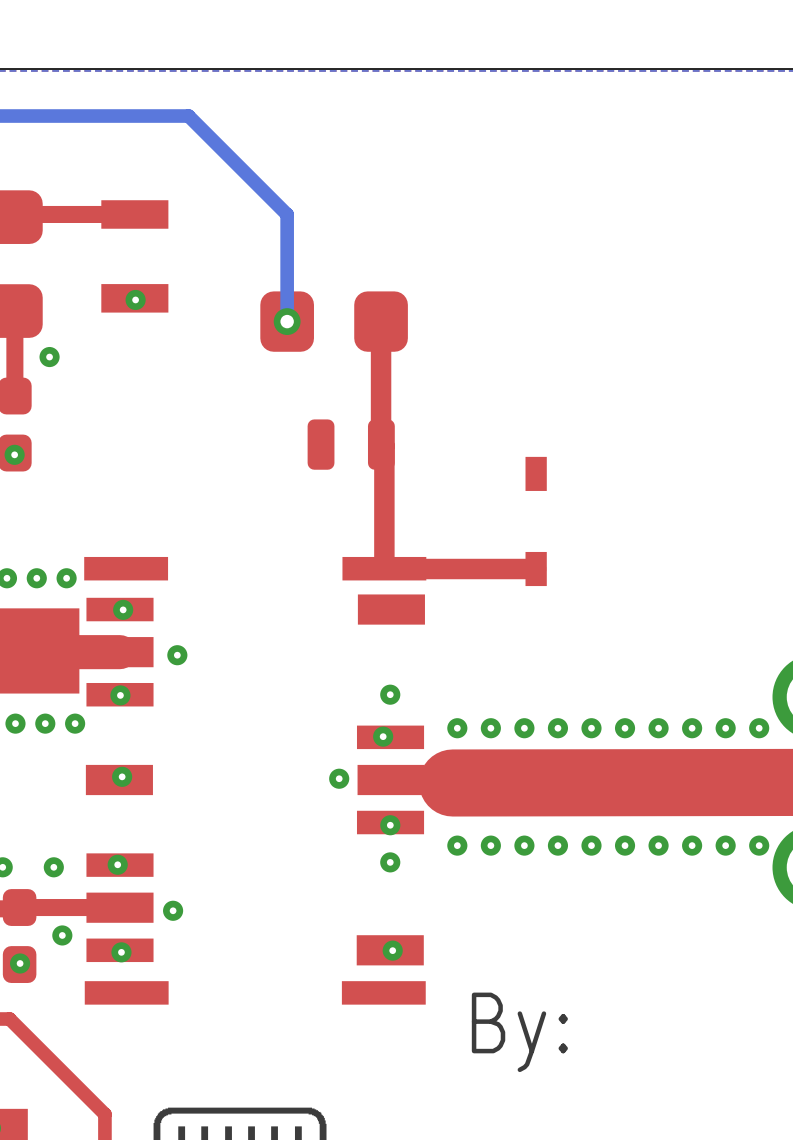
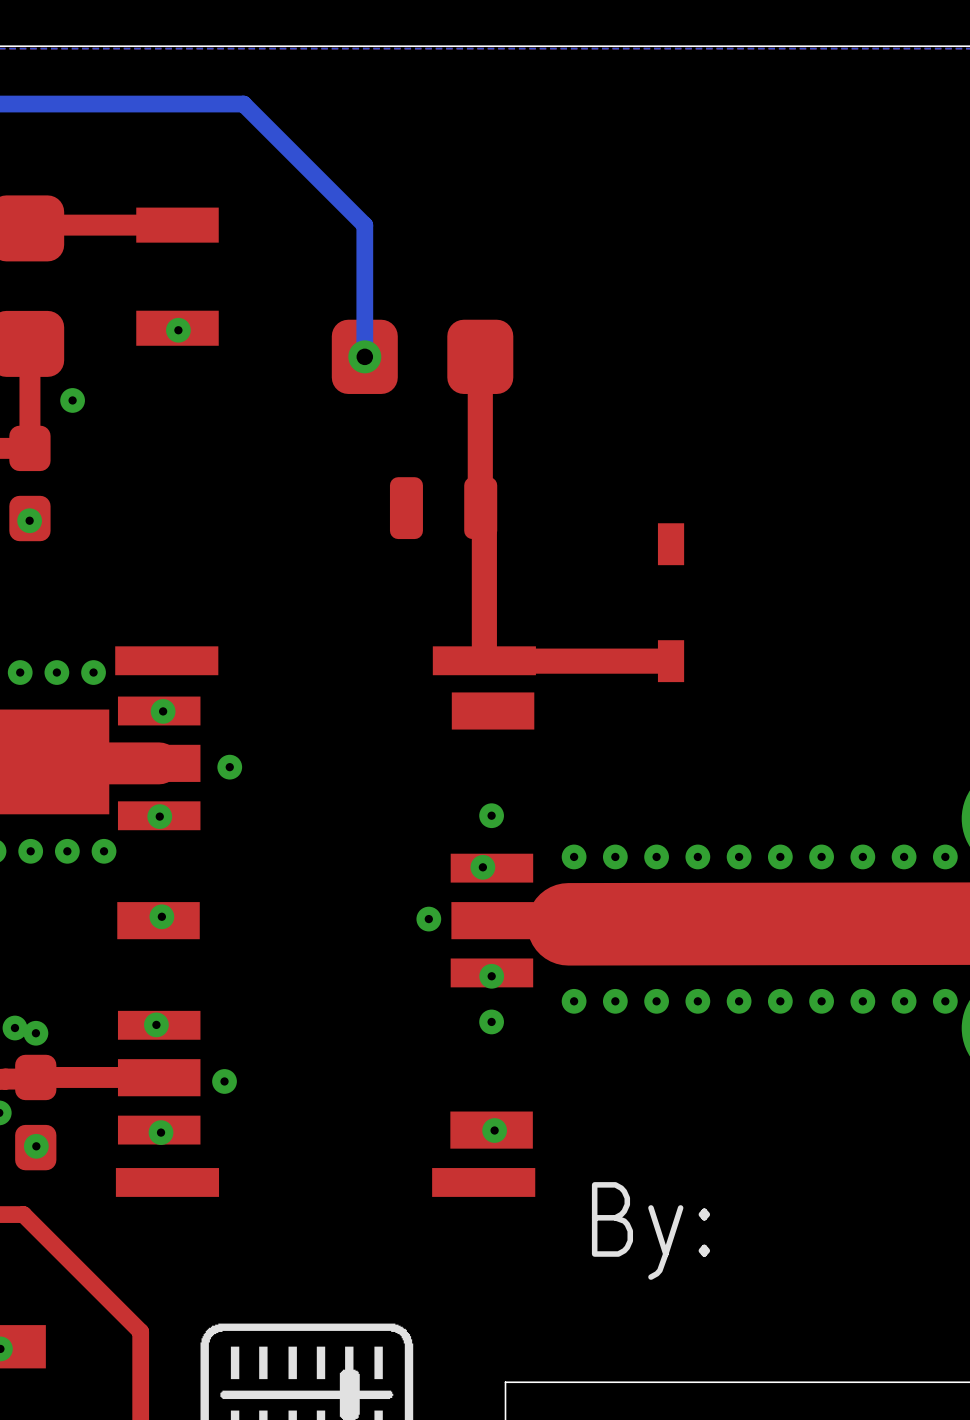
via position: (53, 867) -> (35, 1033)
via: (62, 935) -> none

